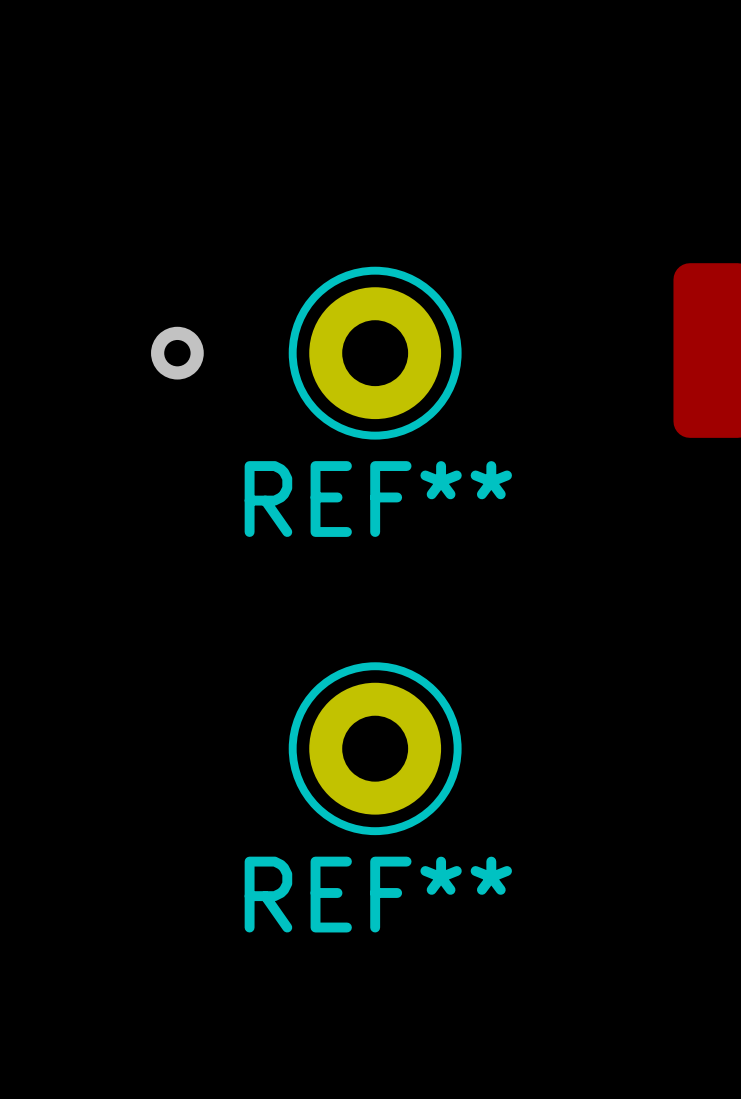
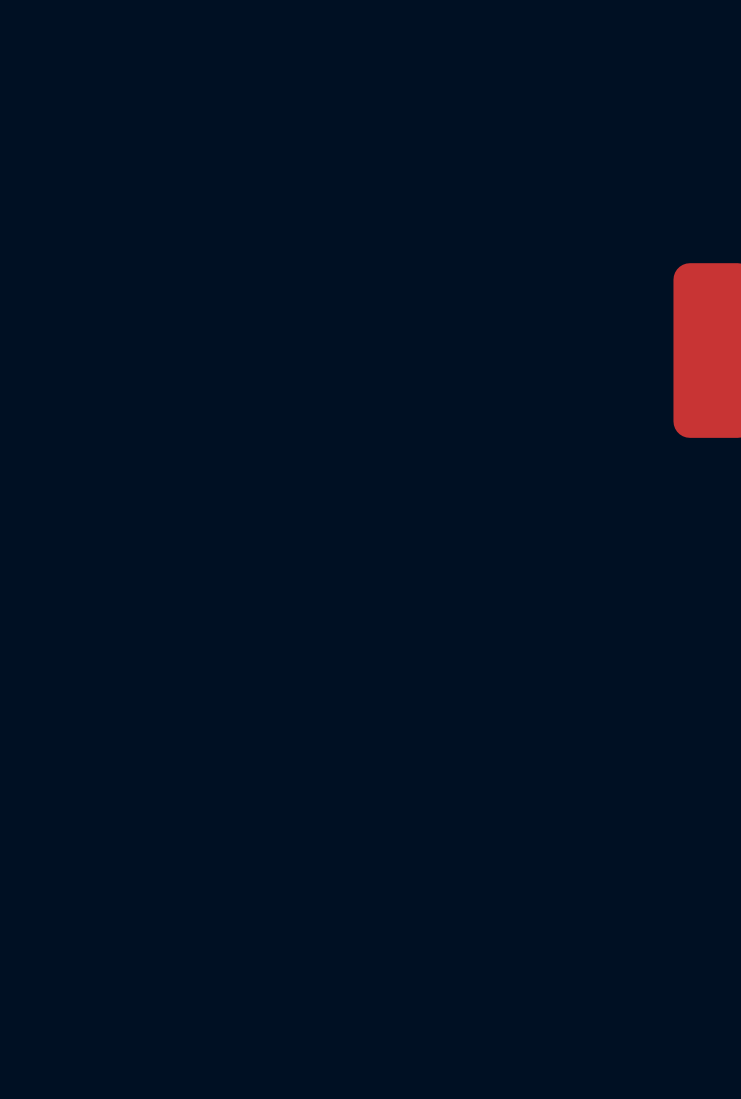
via: (177, 353) -> none
REF**: (375, 353) -> none
REF**: (375, 748) -> none

